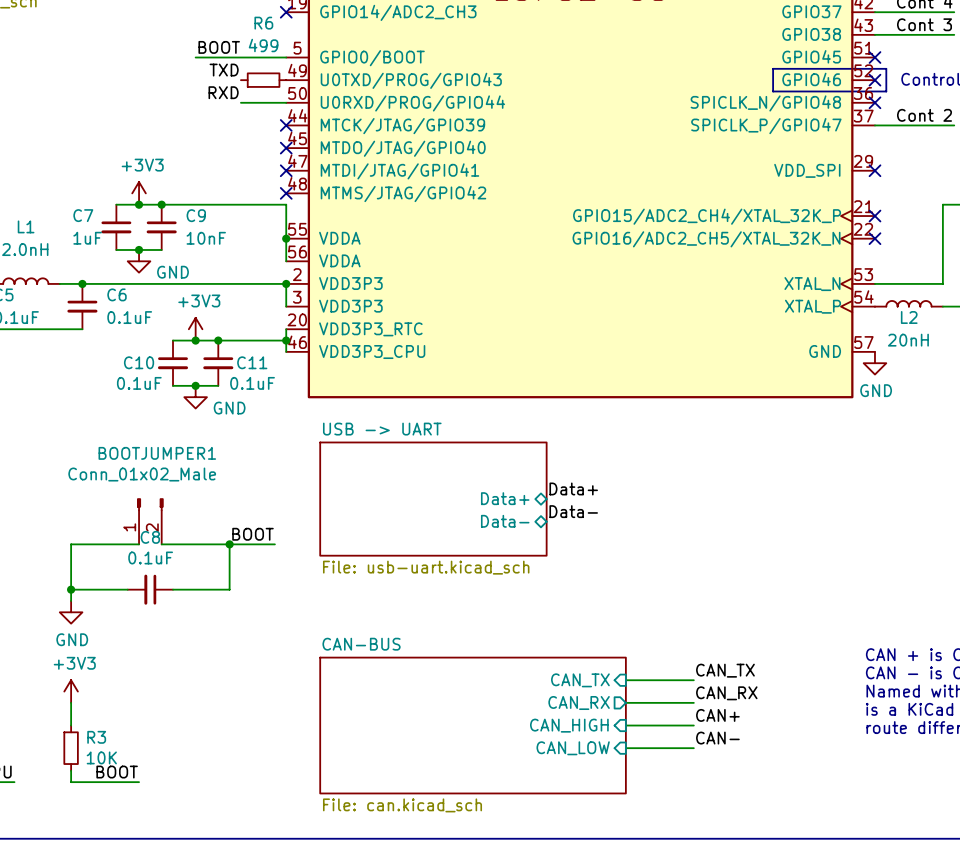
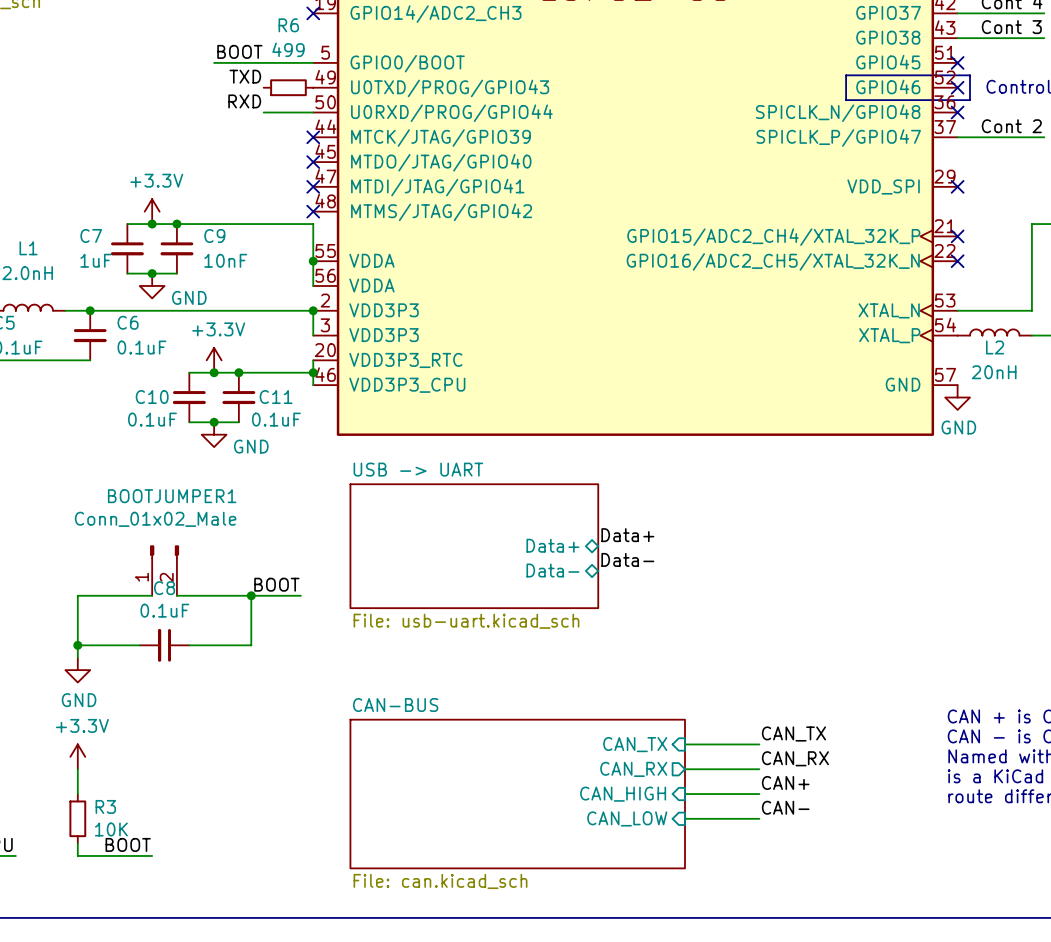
power symbol: +3V3 (139, 193) -> +3.3V (152, 211)
power symbol: +3V3 (195, 329) -> +3.3V (214, 360)
power symbol: +3V3 (71, 691) -> +3.3V (77, 756)

